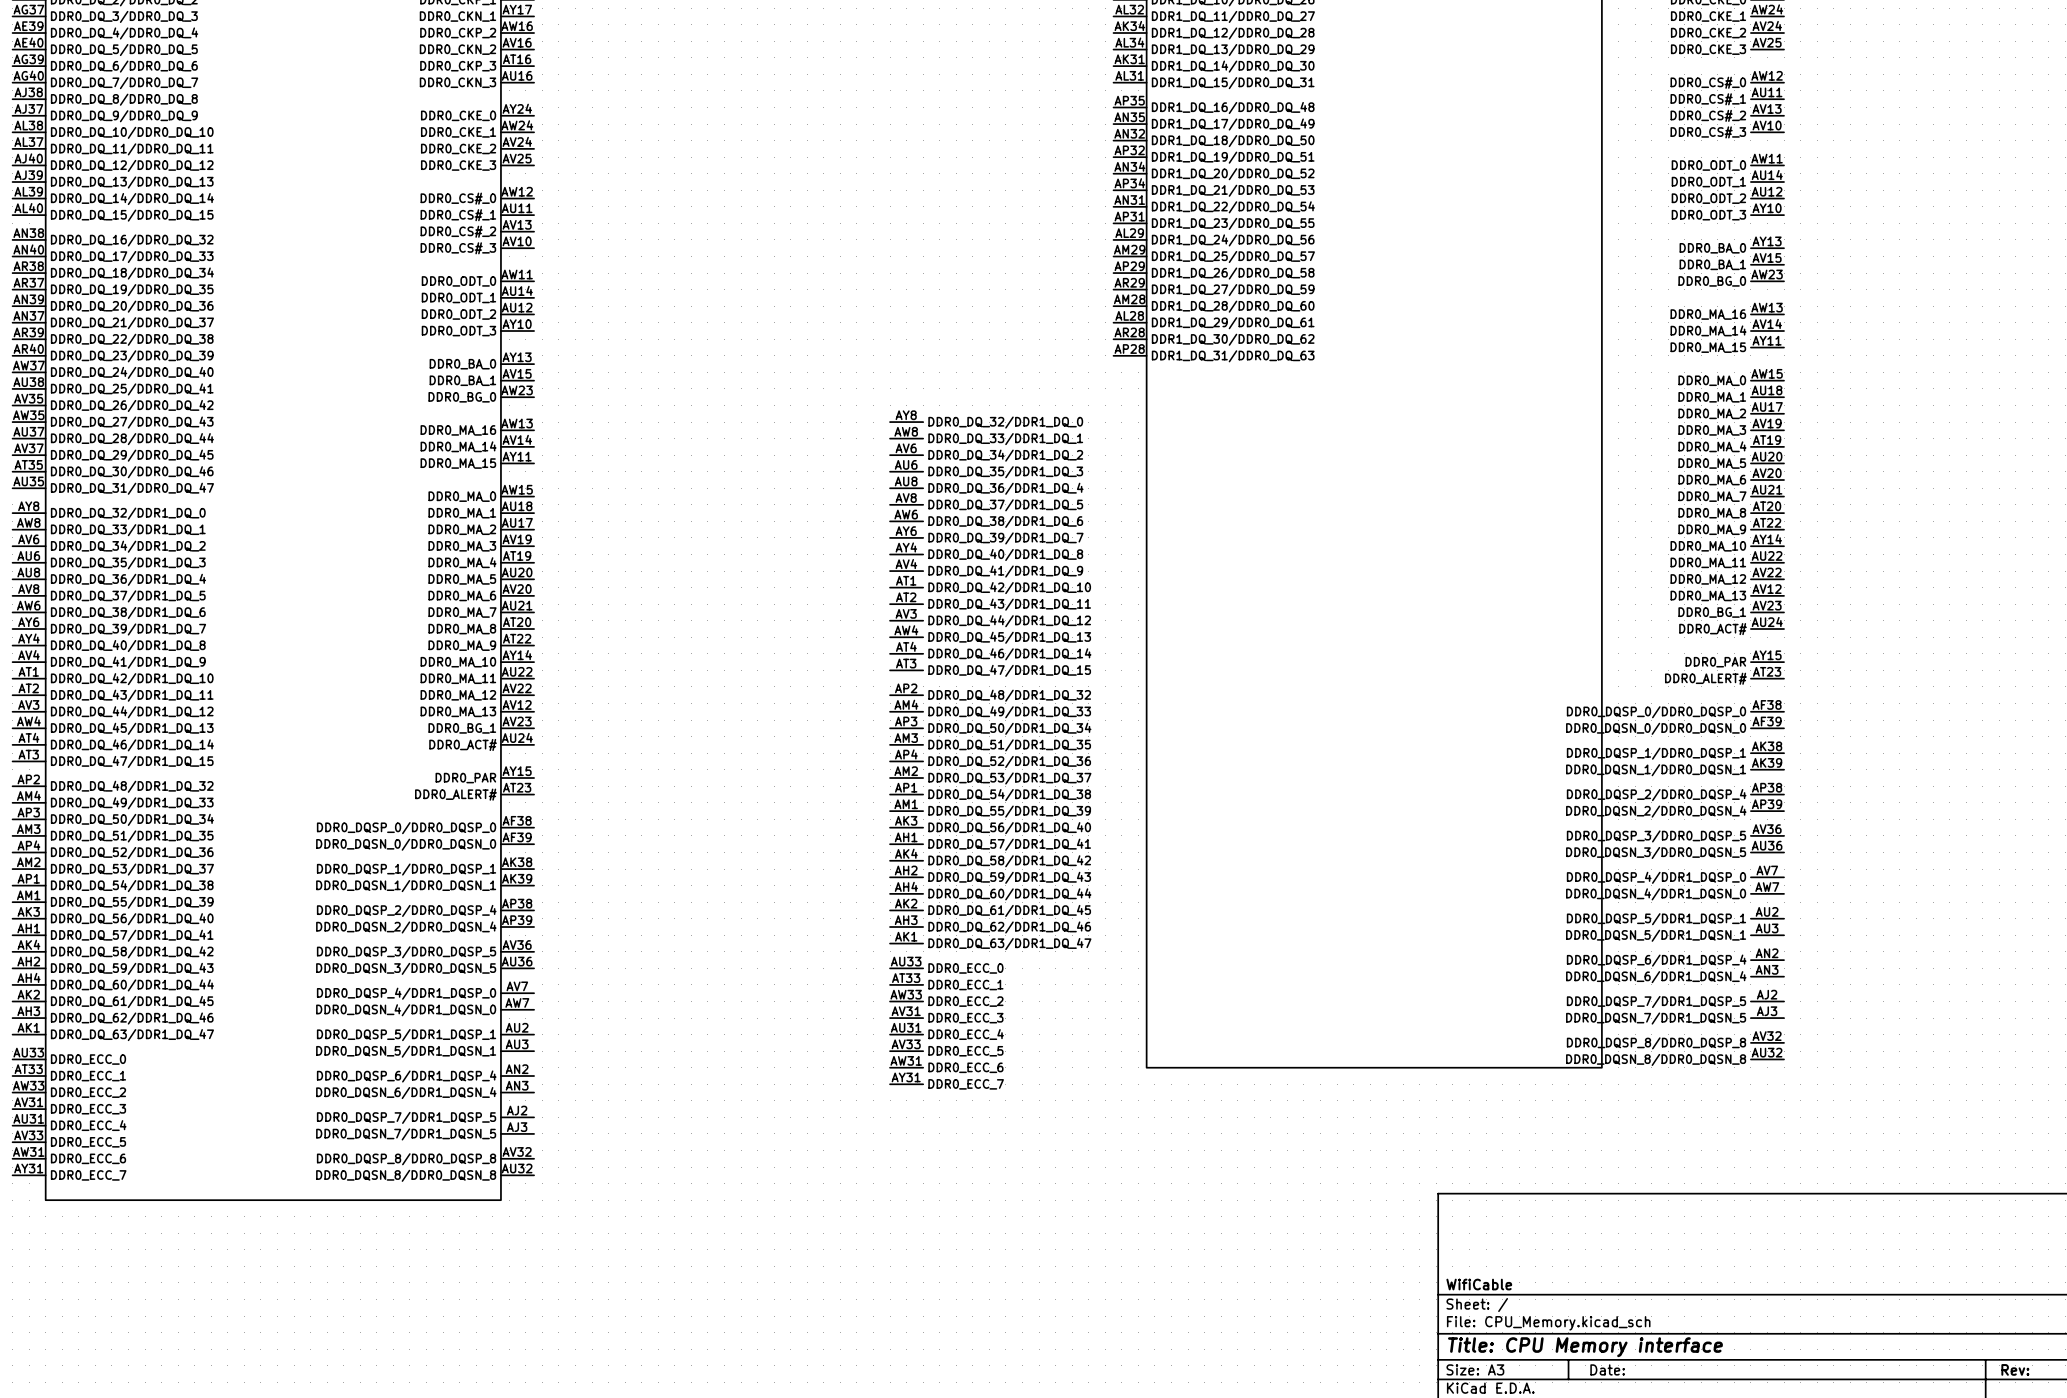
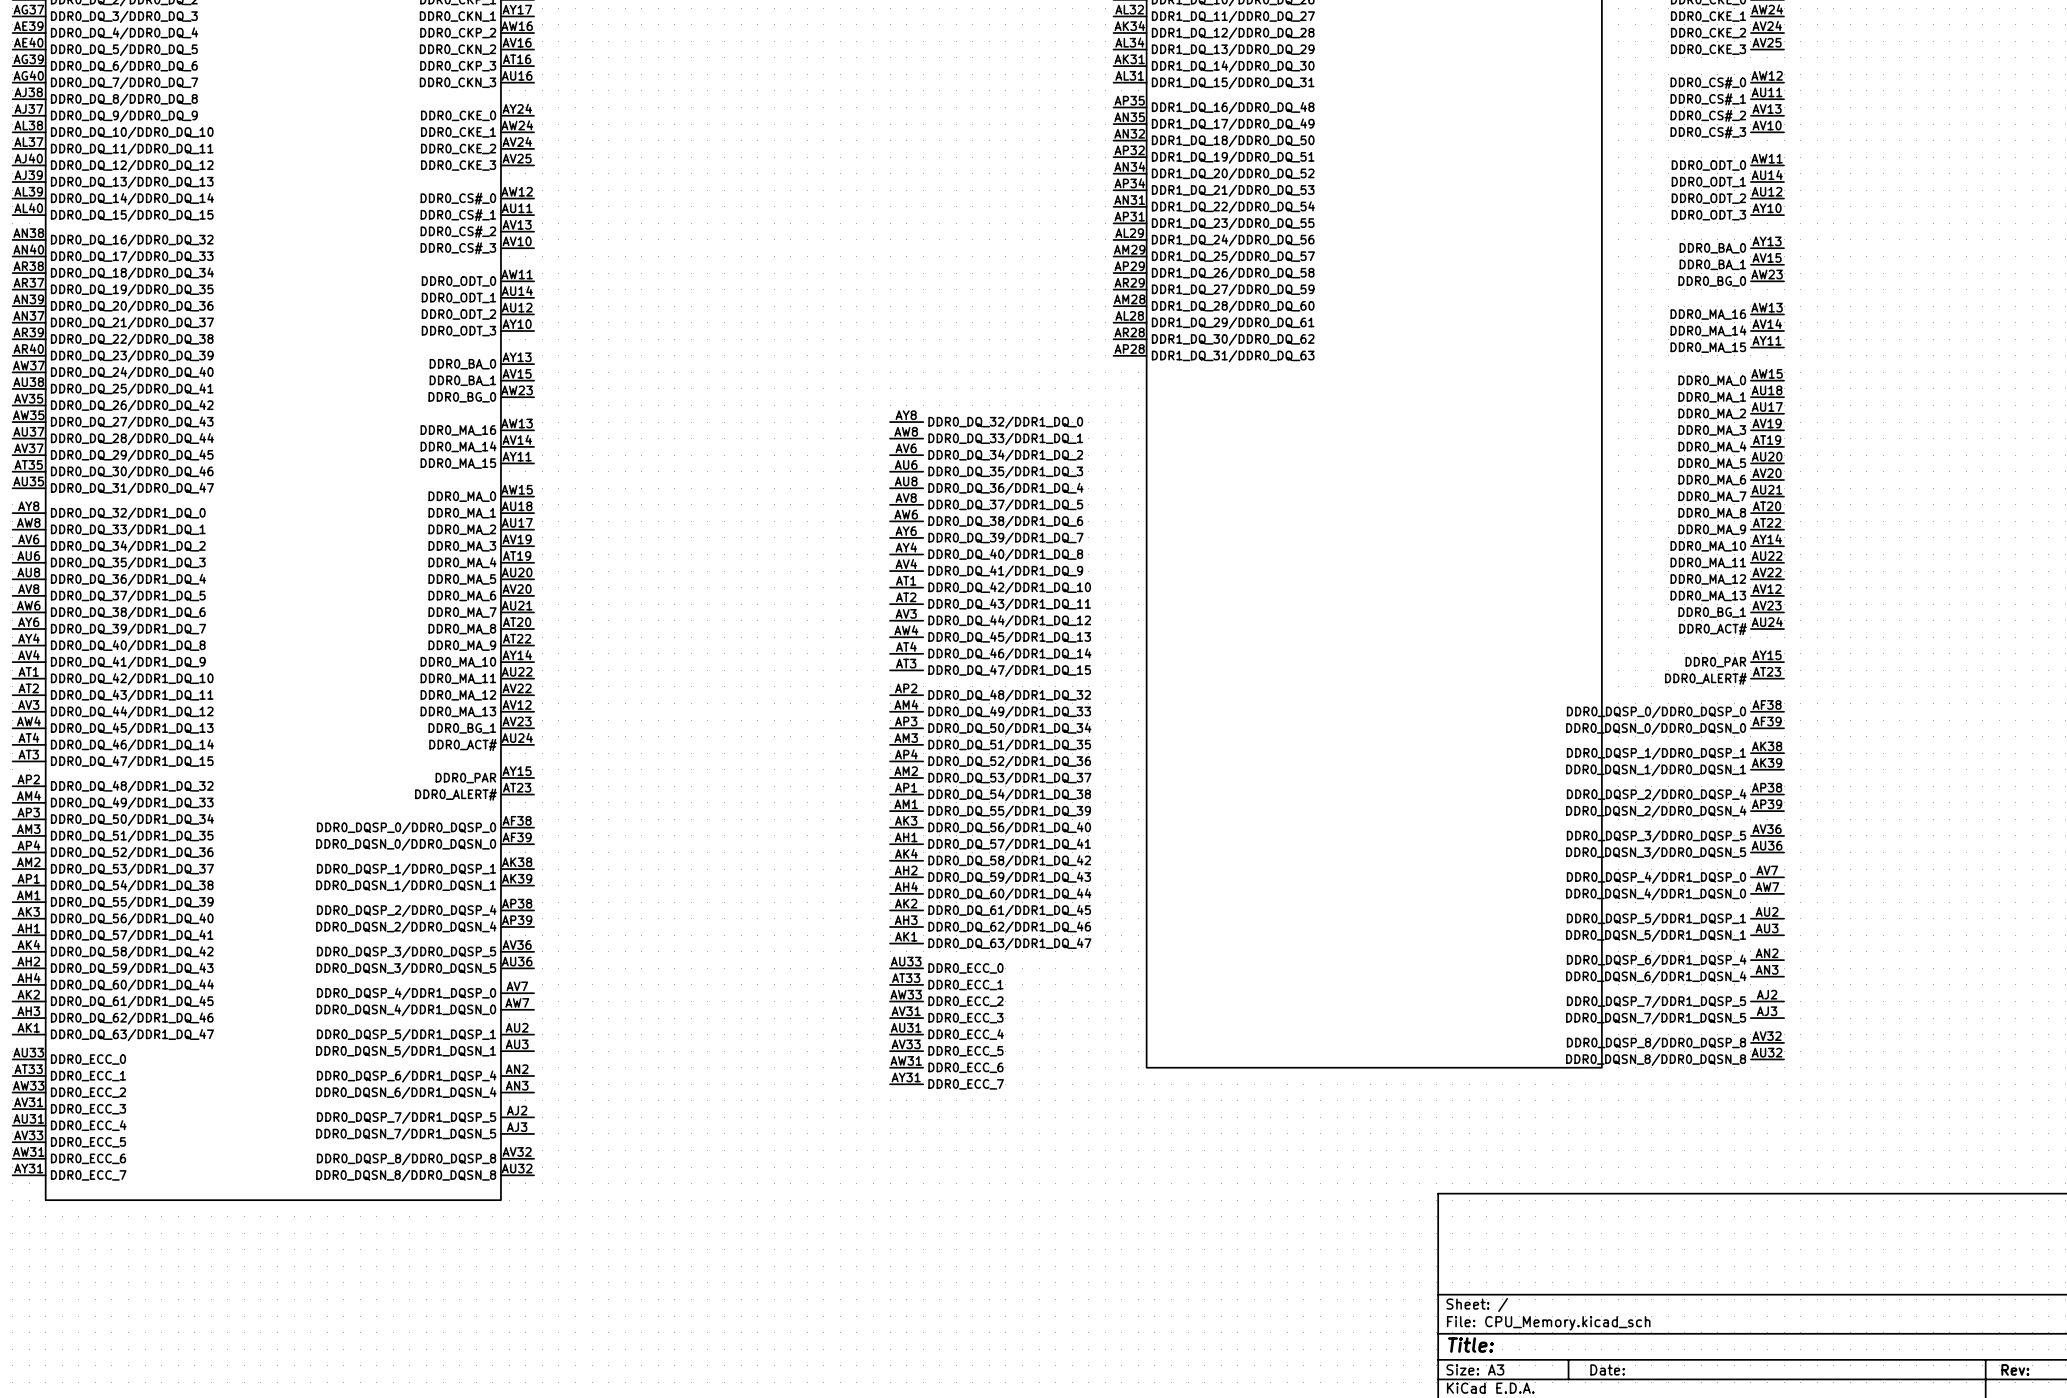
title block: WifiCable (1479, 1284) -> none
title block: Title: CPU Memory interface (1585, 1347) -> Title: (1470, 1345)

